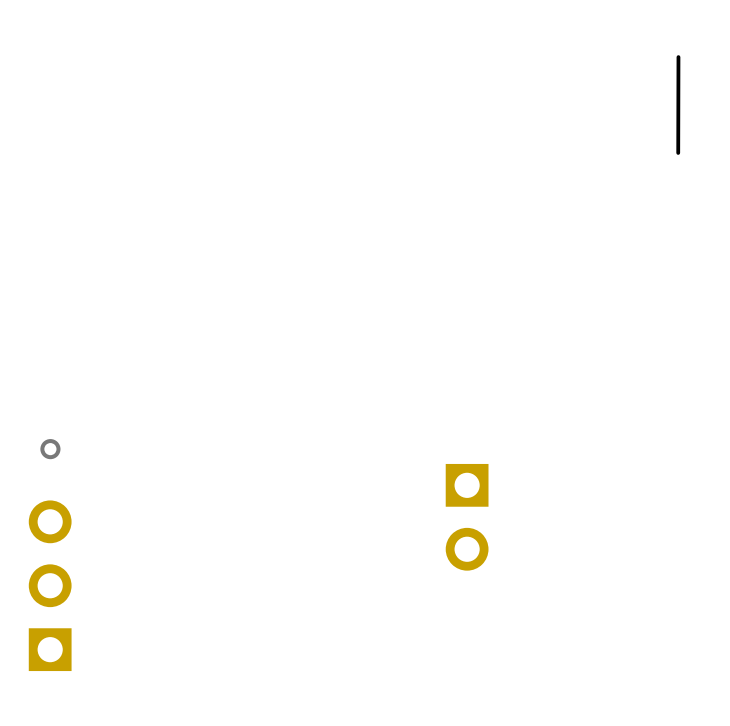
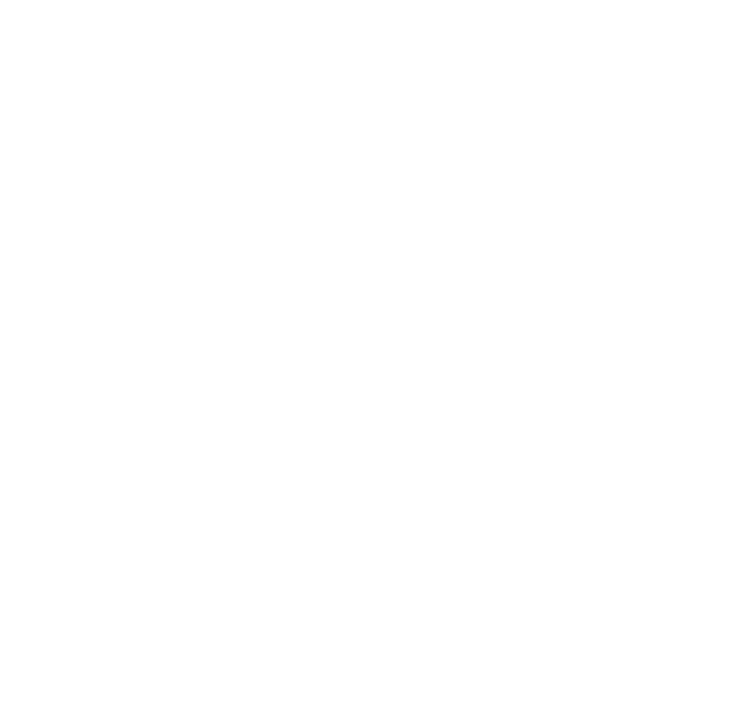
board edge: (678, 57) (678, 152) -> none
via: (50, 449) -> none
part: (467, 517) -> none
part: (50, 585) -> none

